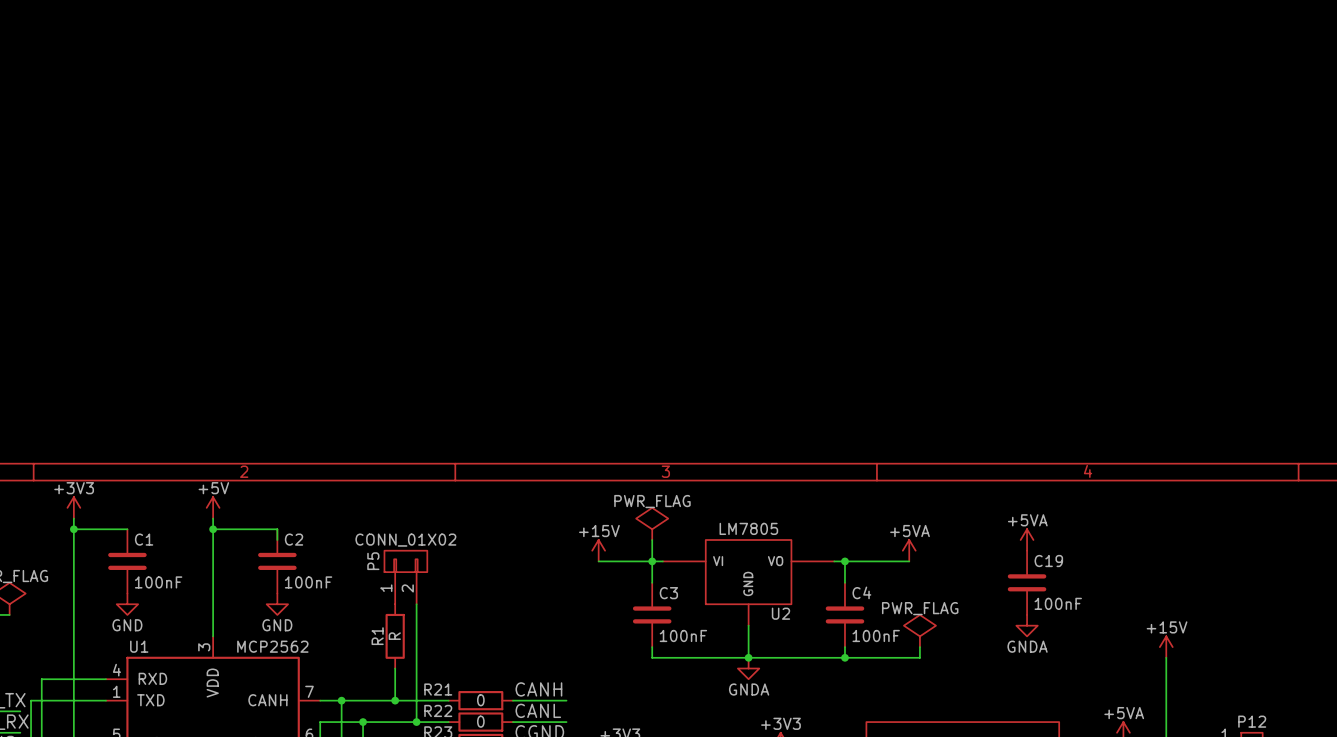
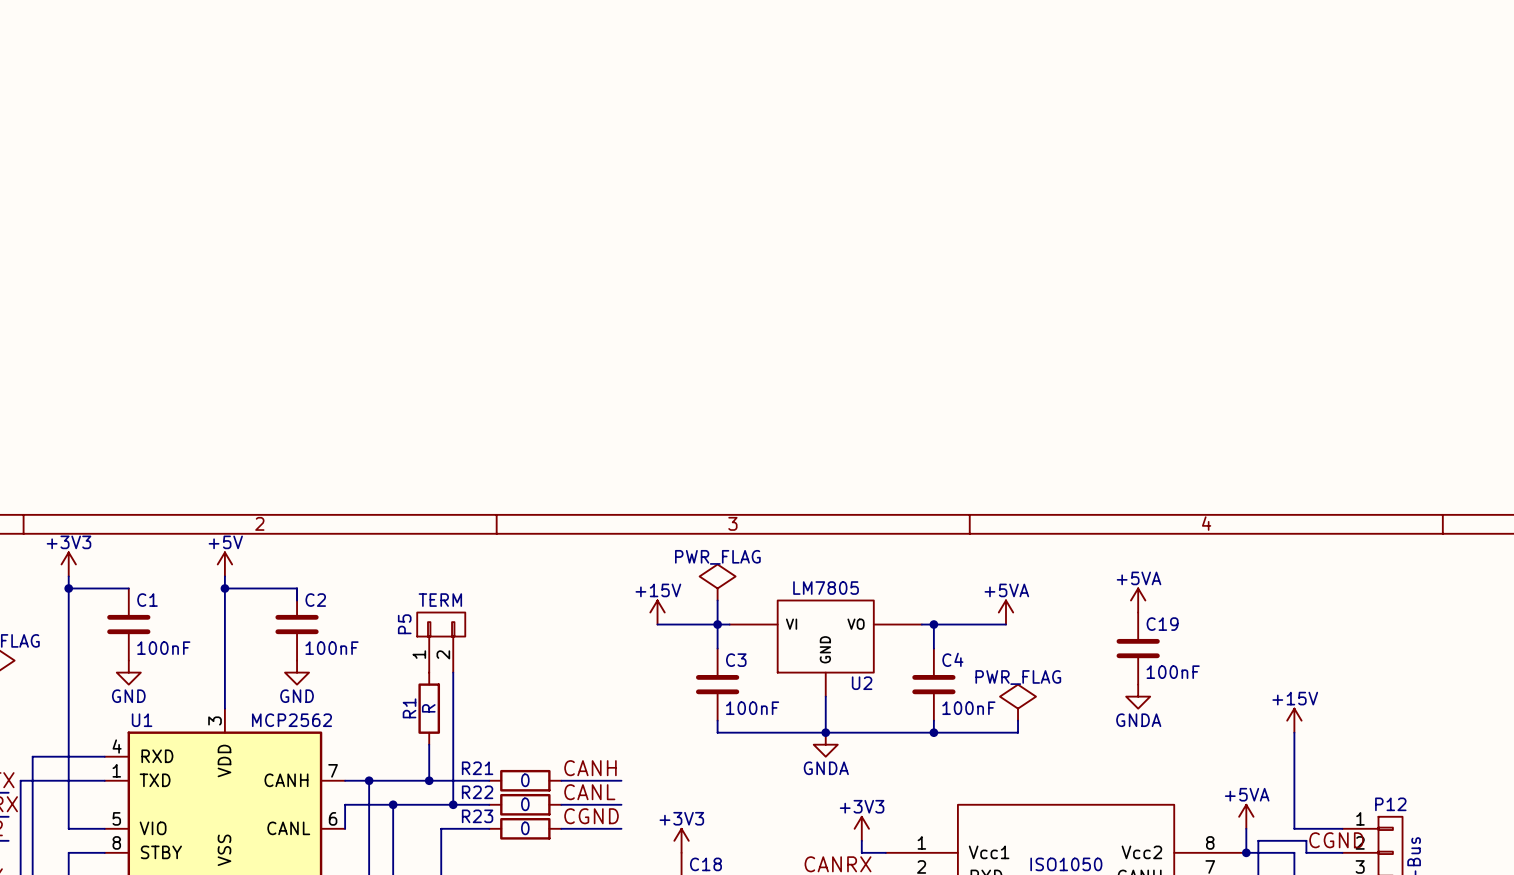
P5 value: CONN_01X02 (405, 540) -> TERM (440, 600)

